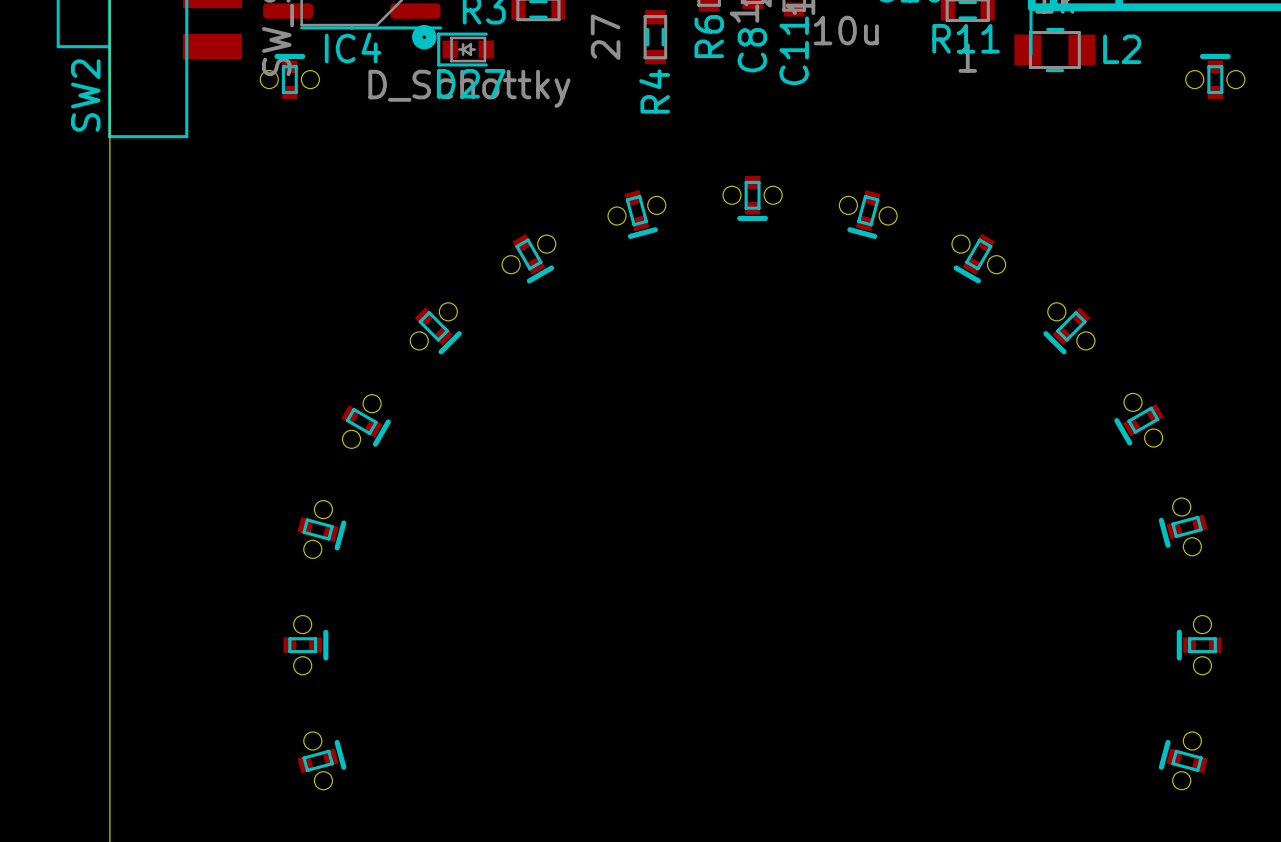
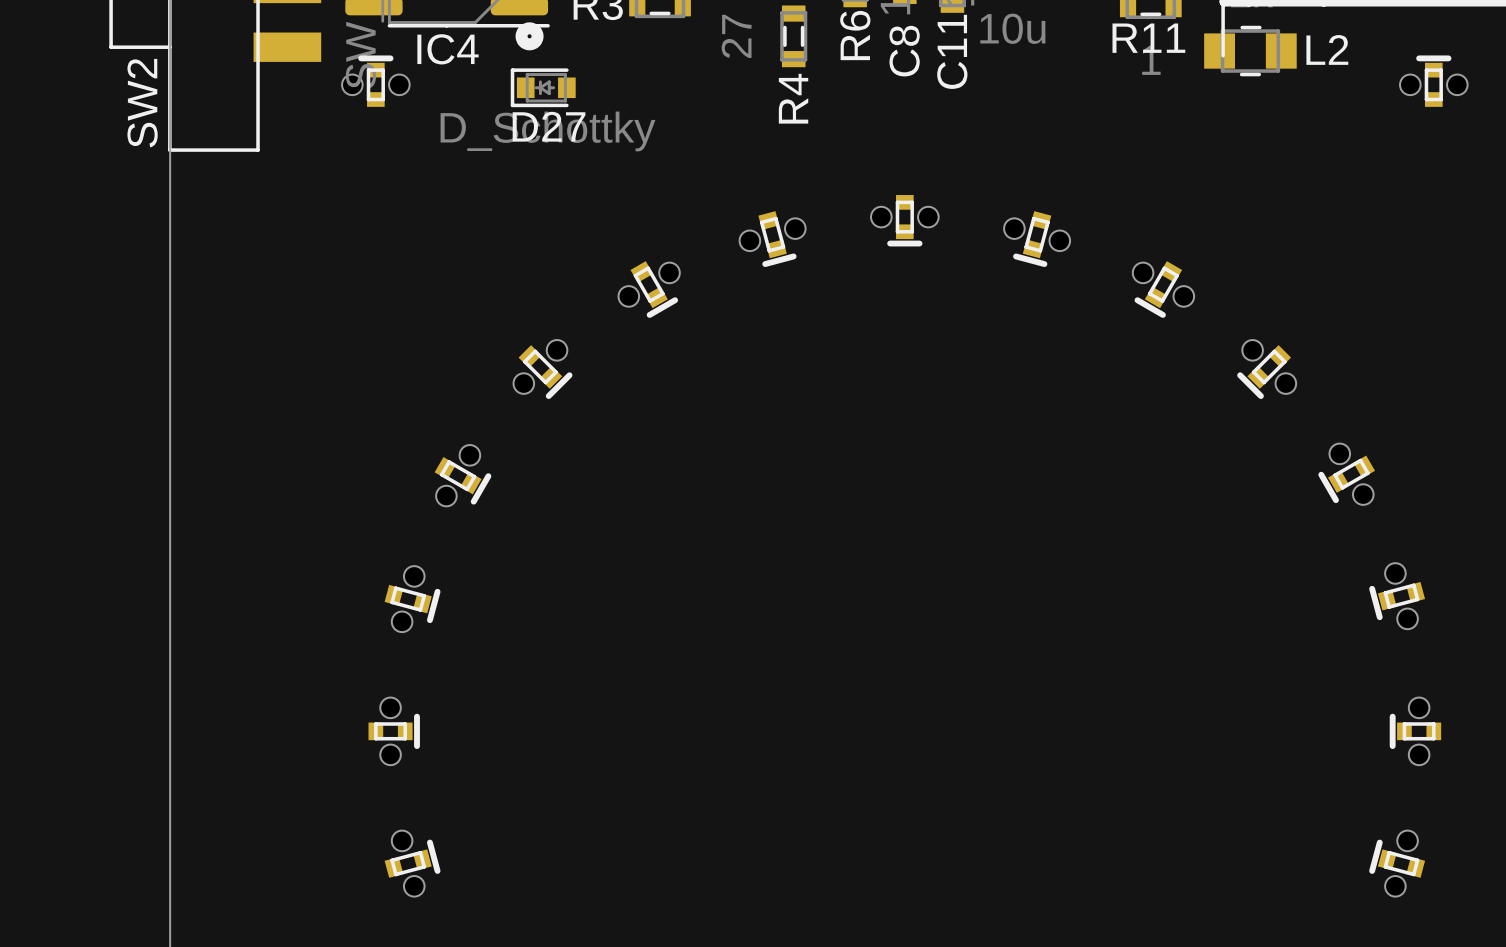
D27 position: (465, 49) -> (543, 87)

